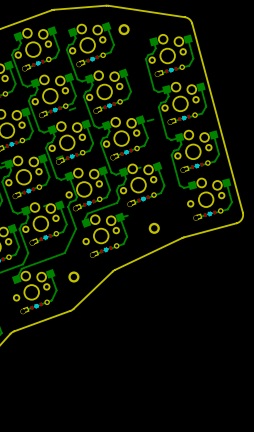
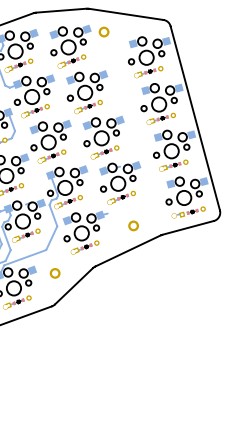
bottom track: (107, 26) (114, 44) (110, 52) (97, 57) -> none
bottom track: (52, 31) (59, 50) (55, 57) (43, 62) -> none
bottom track: (73, 31) (75, 38) (66, 49) (77, 79) (82, 81) (90, 78) (92, 84) (83, 96) (94, 125) (99, 128) (107, 125) (109, 131) (100, 143) (111, 172) (116, 174) (124, 171) -> none
bottom track: (188, 39) (193, 58) (189, 65) (176, 69) -> none
bottom track: (154, 42) (155, 48) (145, 59) (154, 89) (158, 92) (166, 89) (168, 96) (158, 107) (166, 137) (171, 140) (179, 137) (181, 144) (171, 155) (179, 185) (184, 188) (192, 185) -> none
bottom track: (124, 73) (130, 91) (127, 98) (114, 103) -> none
bottom track: (69, 77) (75, 96) (72, 103) (59, 108) -> none
bottom track: (35, 83) (37, 89) (28, 100) (39, 130) (44, 132) (52, 129) -> none
bottom track: (201, 87) (206, 106) (202, 113) (189, 117) -> none
bottom track: (75, 108) (69, 110) -> none
bottom track: (141, 119) (147, 138) (144, 145) (131, 150) -> none
bottom track: (153, 119) (147, 121) -> none
bottom track: (86, 124) (93, 143) (89, 150) (76, 155) -> none
bottom track: (52, 130) (54, 136) (45, 148) (56, 177) (61, 179) (69, 176) -> none
bottom track: (213, 135) (219, 154) (214, 161) (201, 164) -> none
bottom track: (62, 156) (56, 158) -> none
bottom track: (42, 158) (49, 177) (46, 184) (33, 189) -> none
bottom track: (157, 167) (164, 185) (161, 193) (148, 197) -> none
bottom track: (103, 171) (110, 190) (106, 197) (93, 202) -> none
bottom track: (123, 172) (126, 178) (116, 190) (119, 198) (117, 202) (87, 213) (85, 219) (86, 222) -> none
bottom track: (226, 183) (231, 202) (227, 209) (214, 212) -> none
bottom track: (60, 205) (66, 224) (63, 231) (50, 236) -> none
part: (209, 214) -> none
part: none -> (192, 212)
bottom track: (120, 218) (127, 236) (123, 244) (110, 248) -> none
bottom track: (50, 273) (56, 290) (51, 300) (41, 304) -> none

